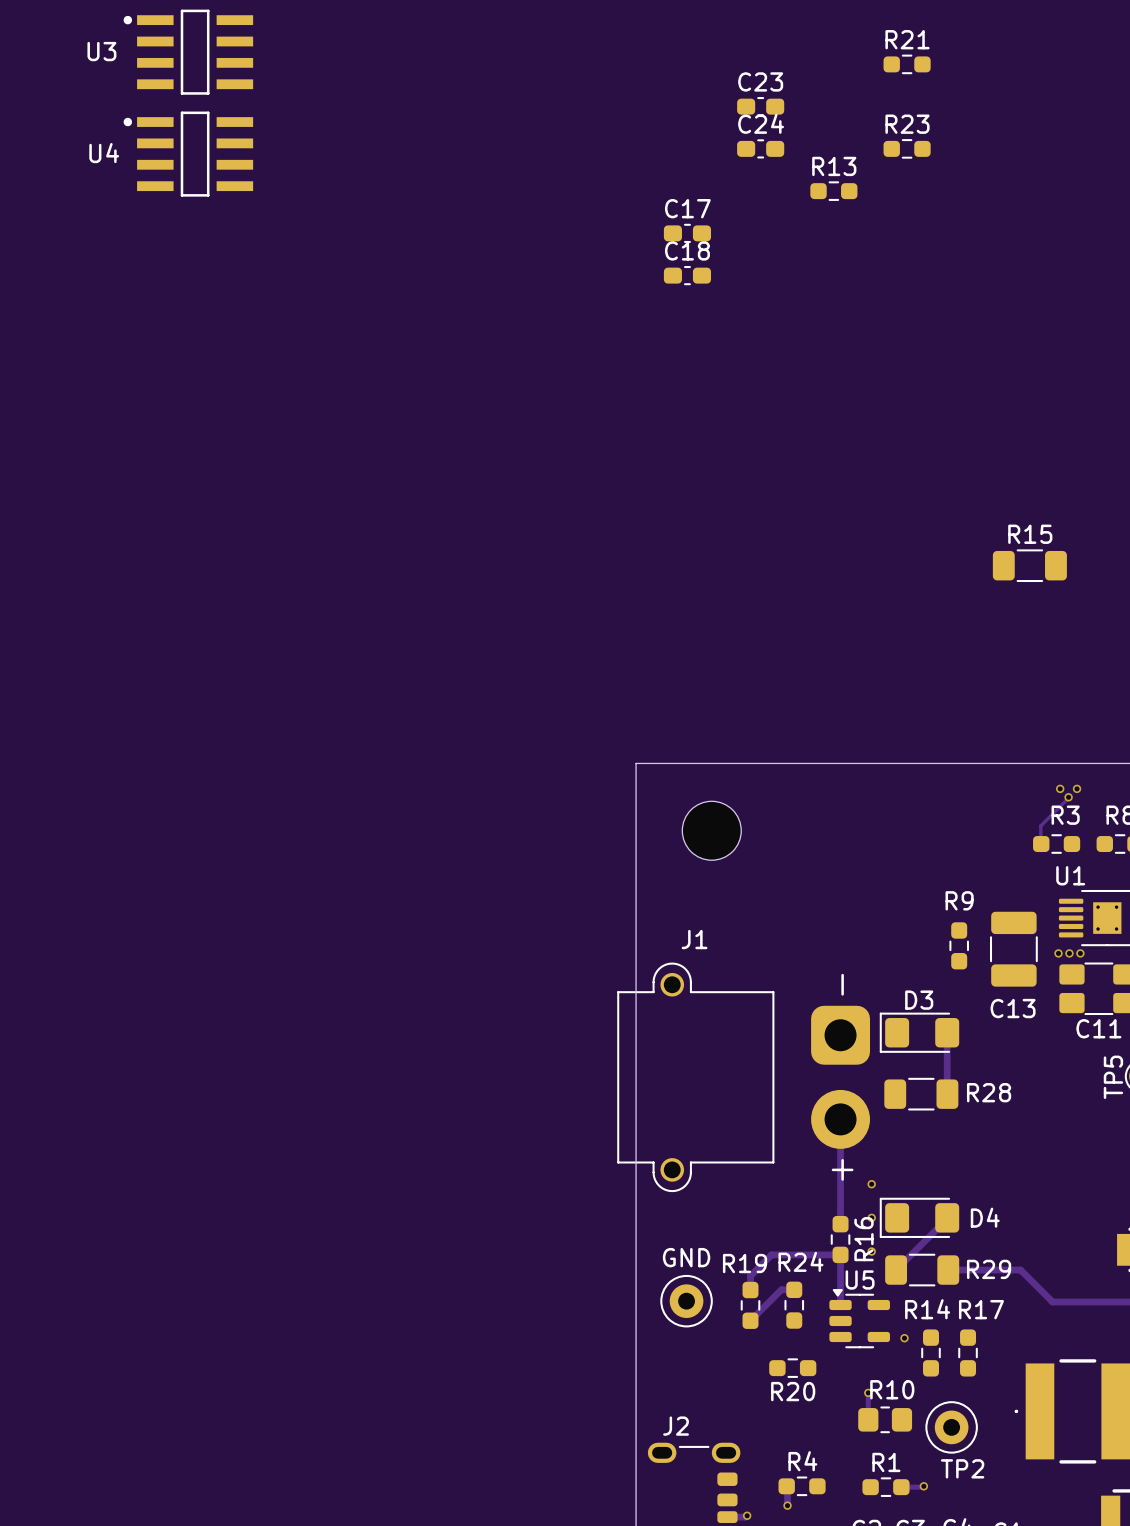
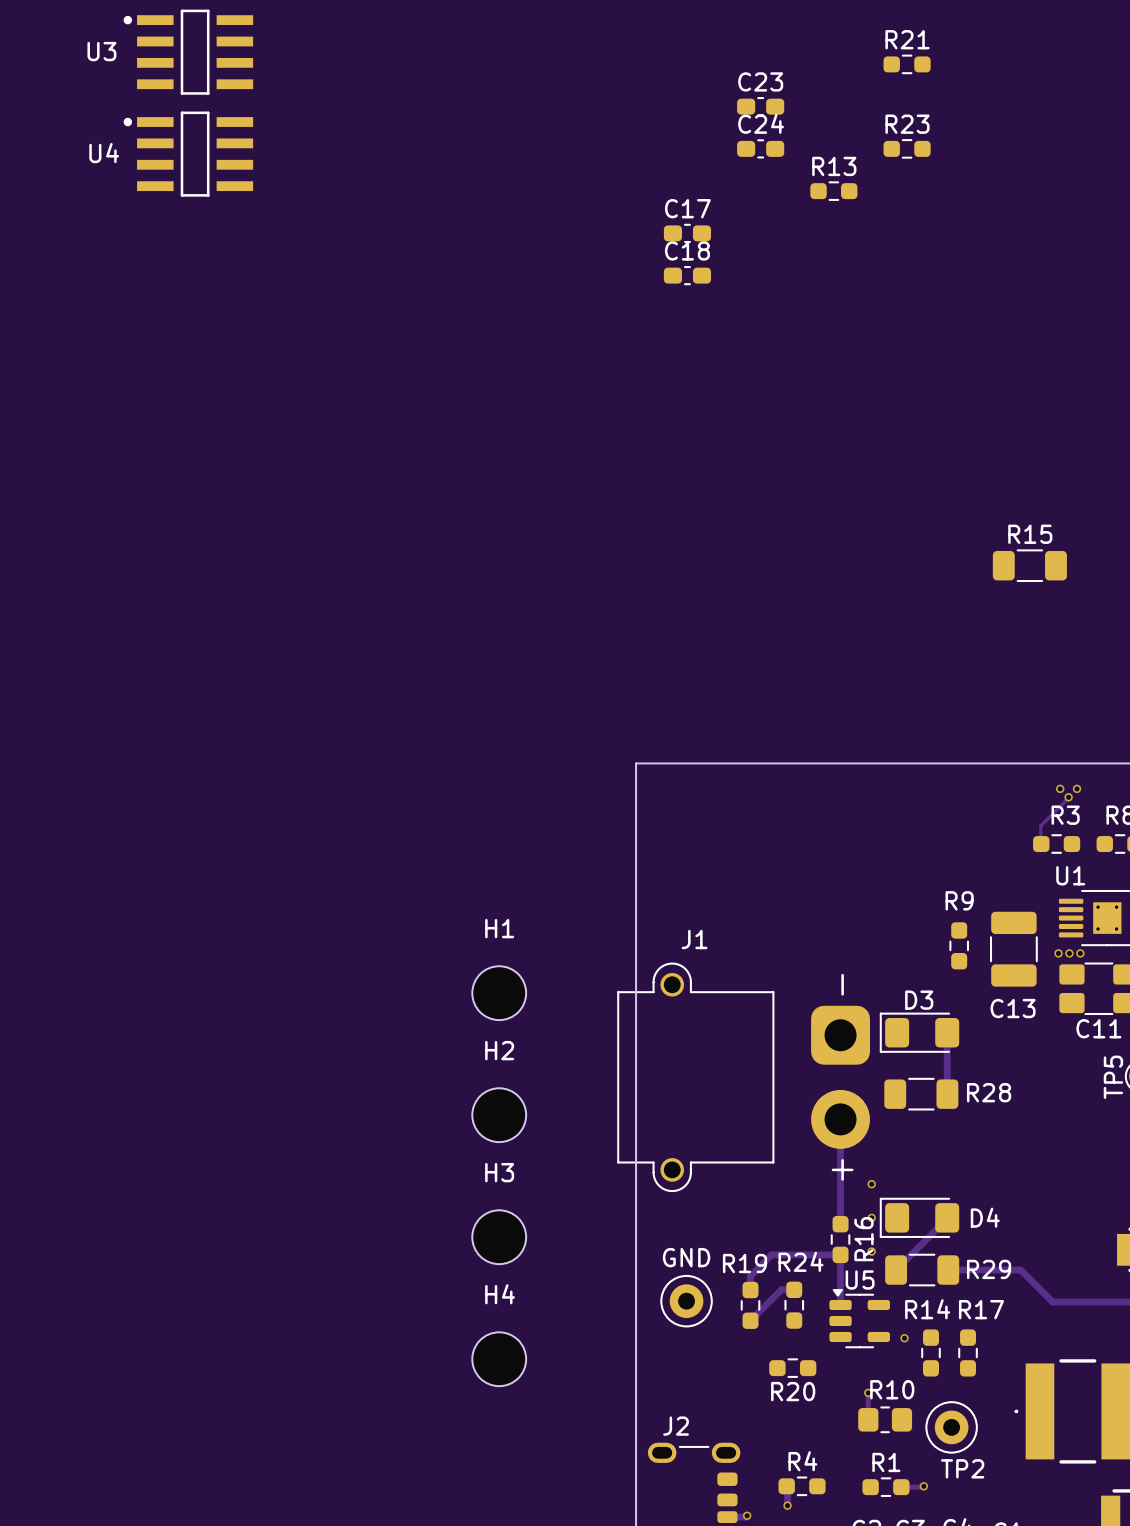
part: (711, 830) -> none
H1: none -> (499, 993)
H2: none -> (499, 1115)
H3: none -> (499, 1237)
H4: none -> (499, 1359)

